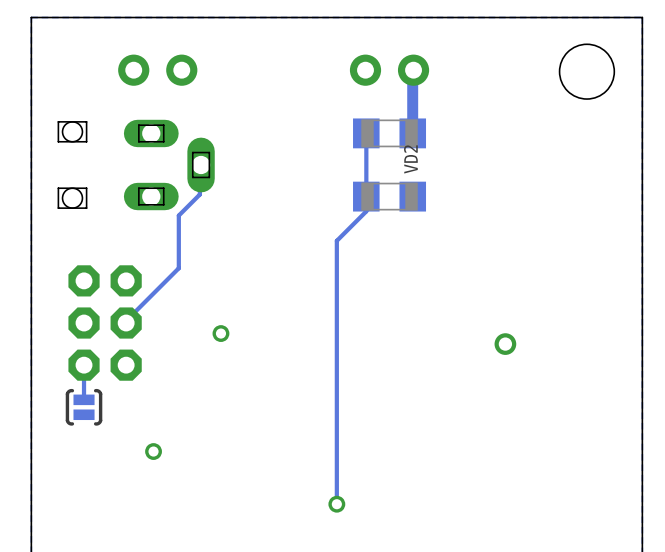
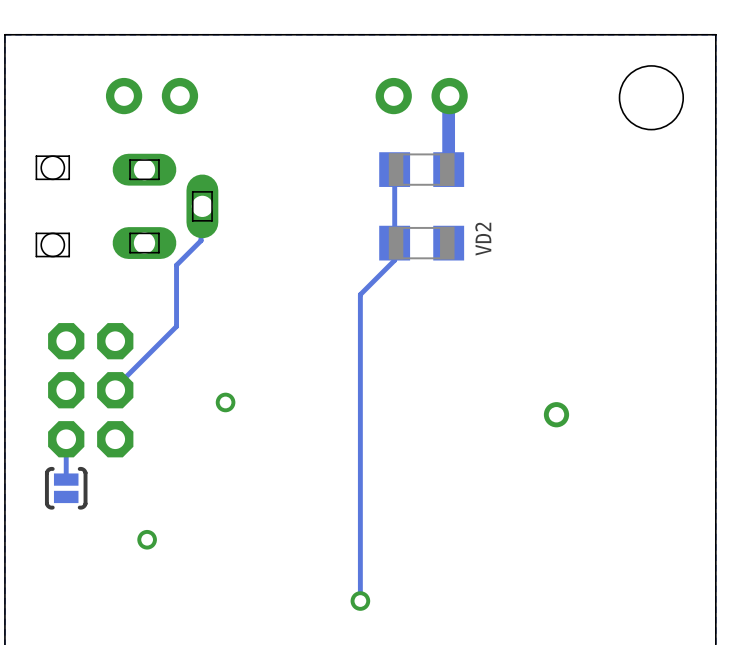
VD2 name position: VD2 (410, 159) -> VD2 (483, 239)

